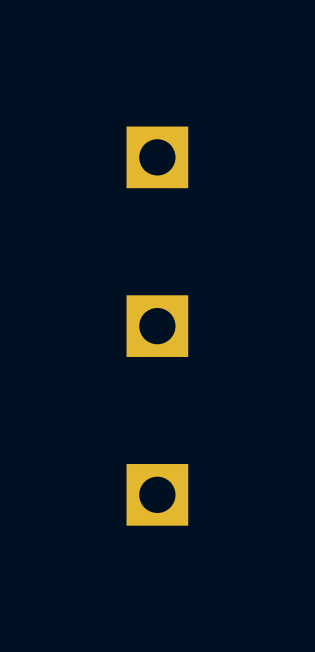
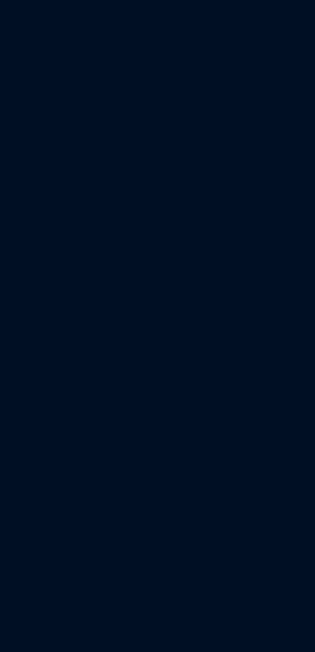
part: (157, 157) -> none
part: (157, 326) -> none
part: (157, 494) -> none

